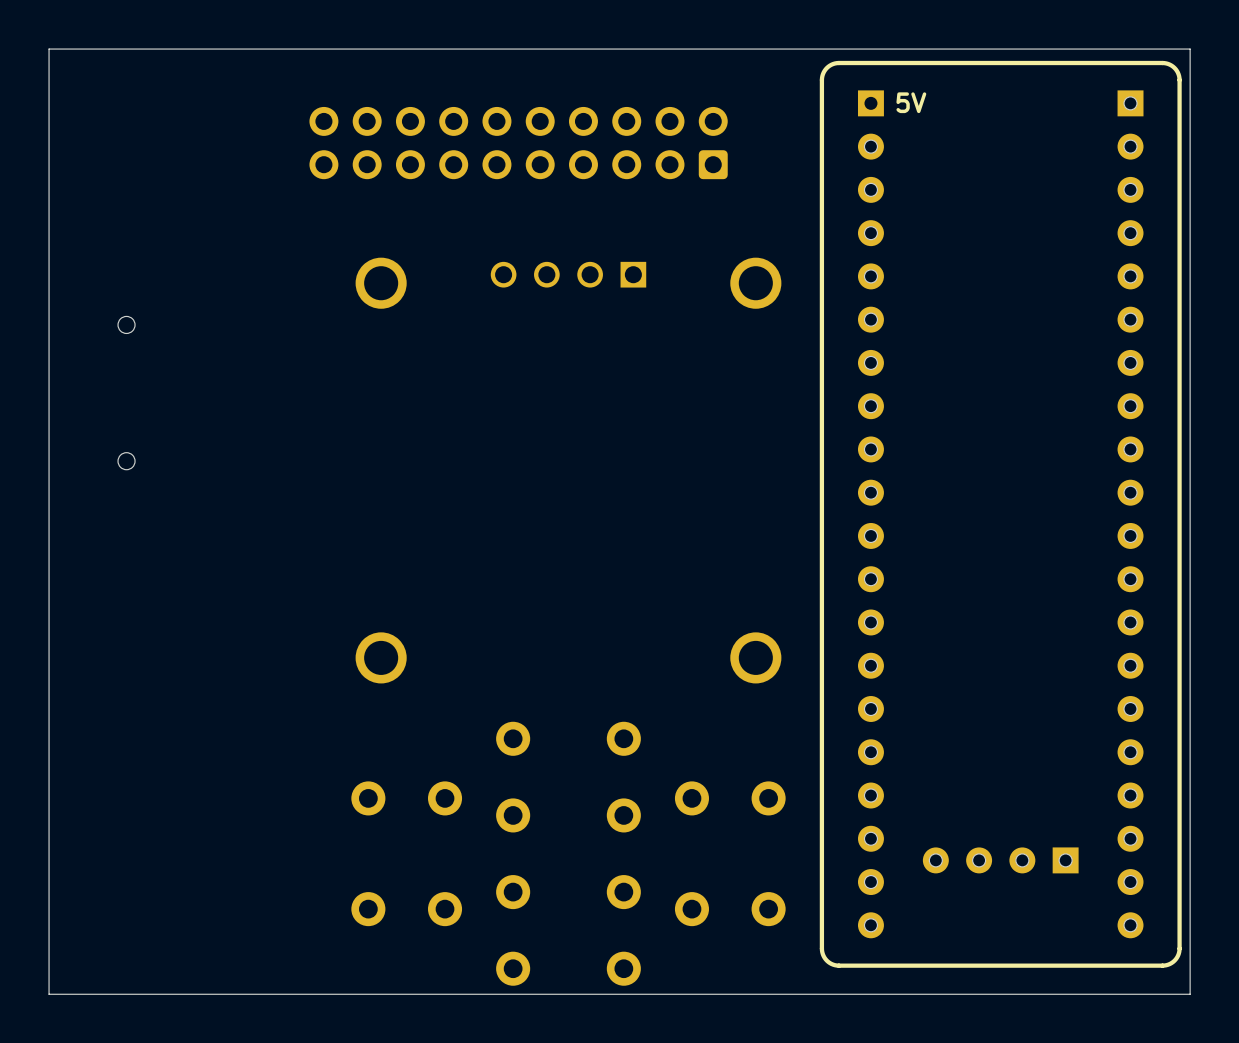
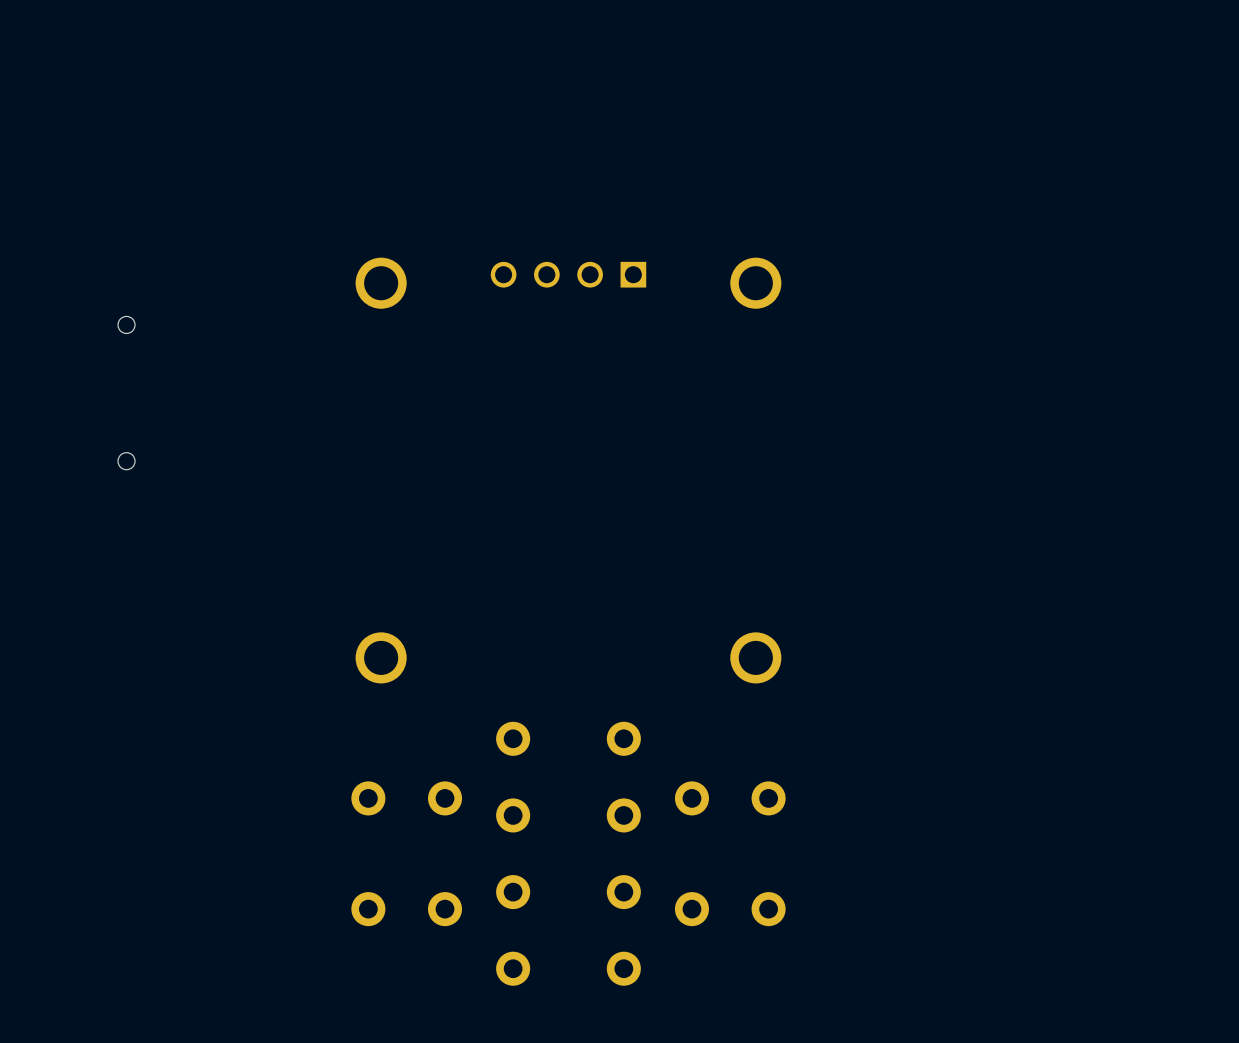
board edge: (1190, 49) (49, 49) (49, 994) (1190, 994) (1190, 49) -> none
part: (518, 143) -> none
part: (1000, 514) -> none

